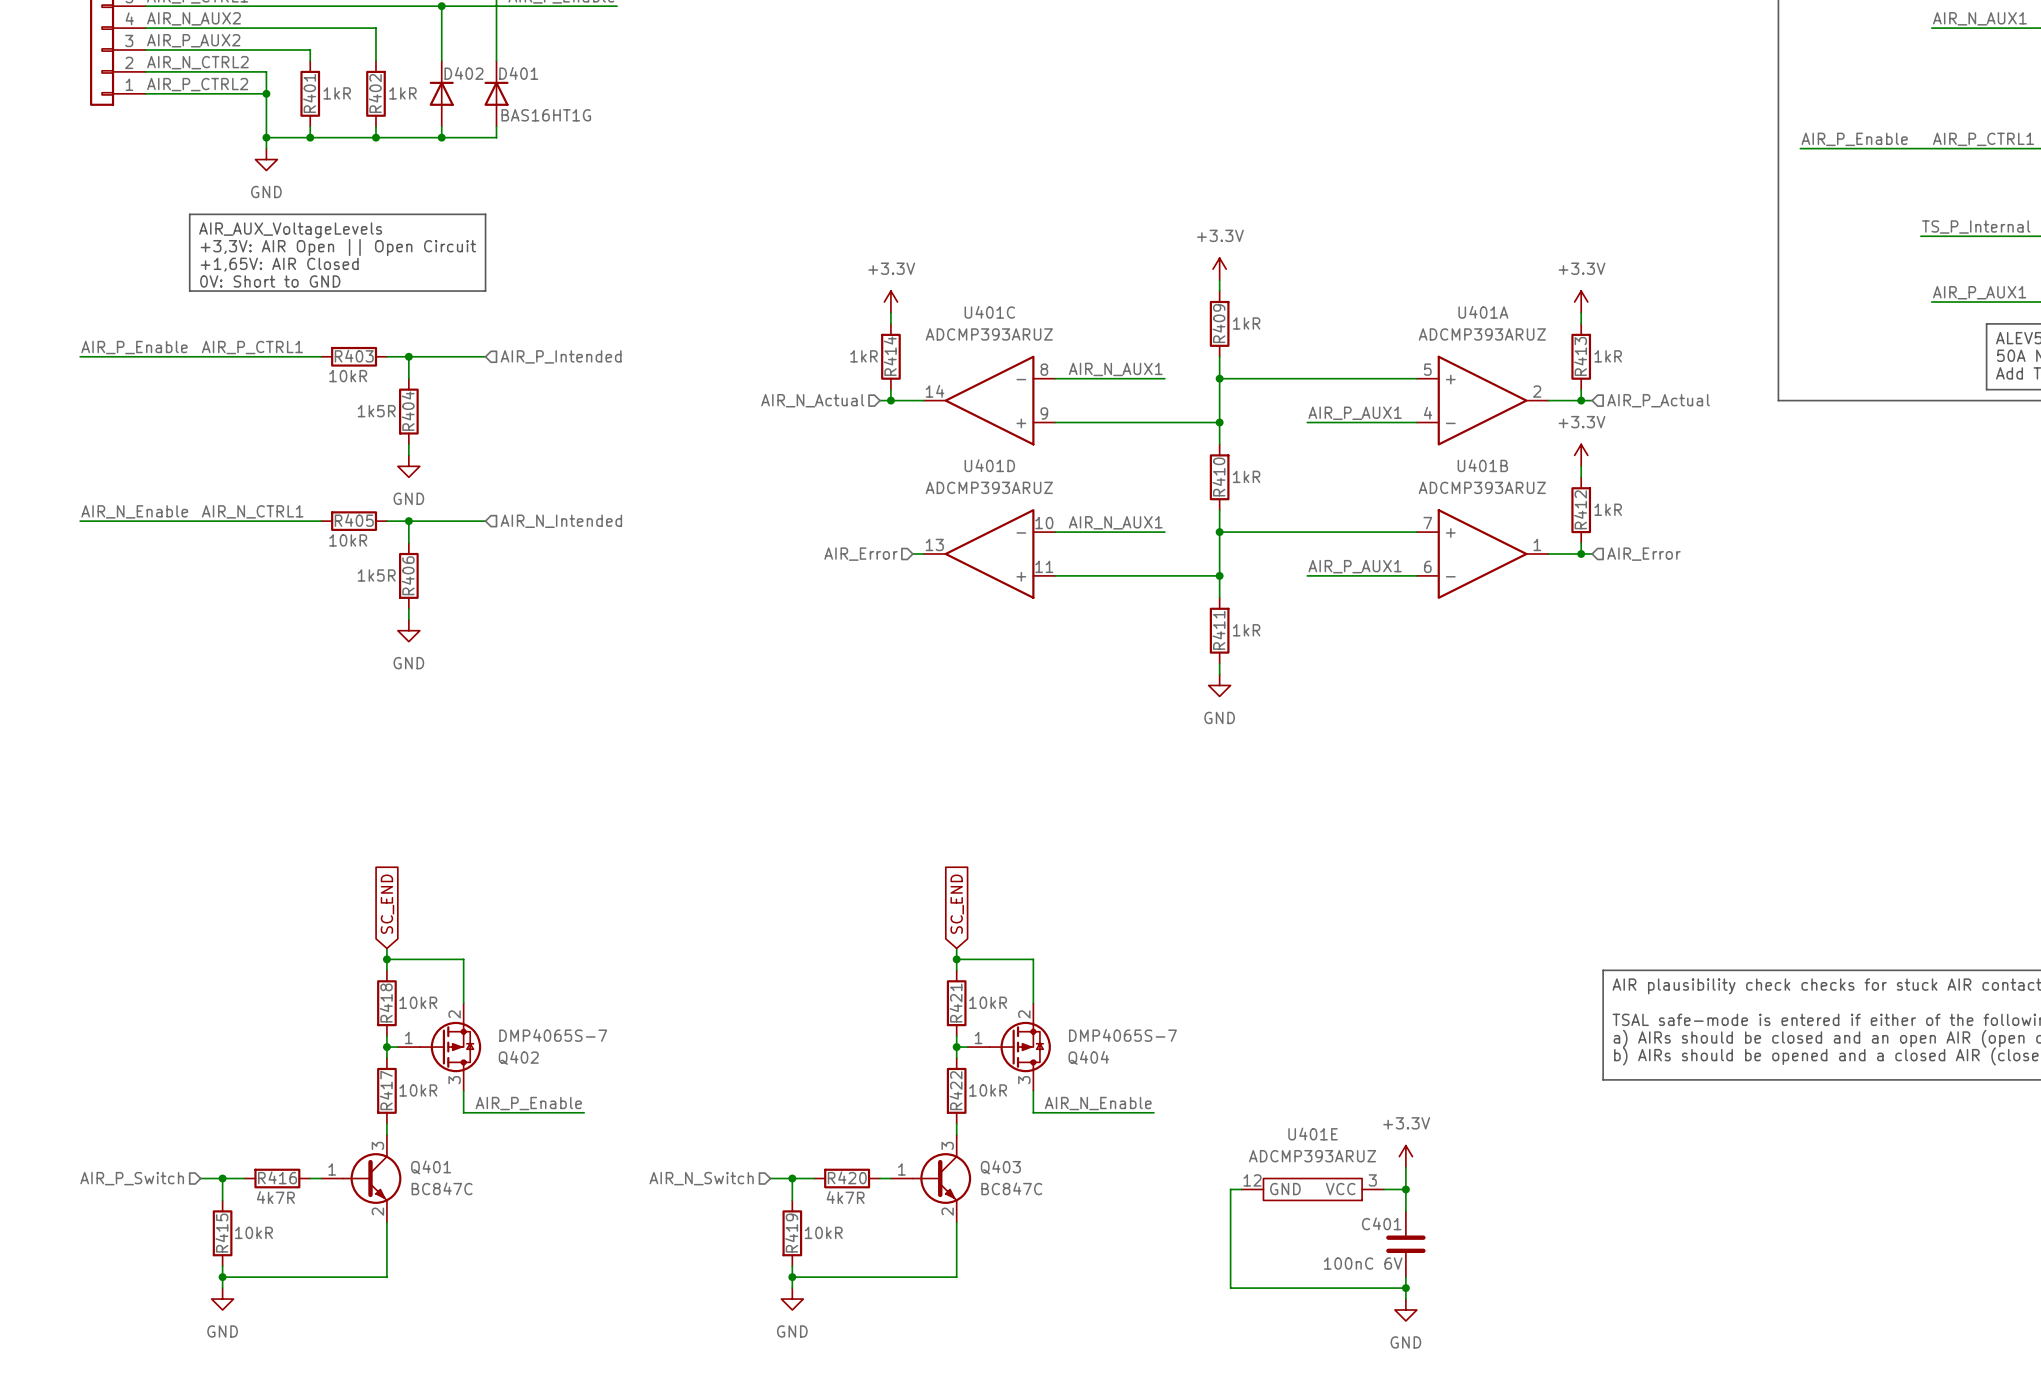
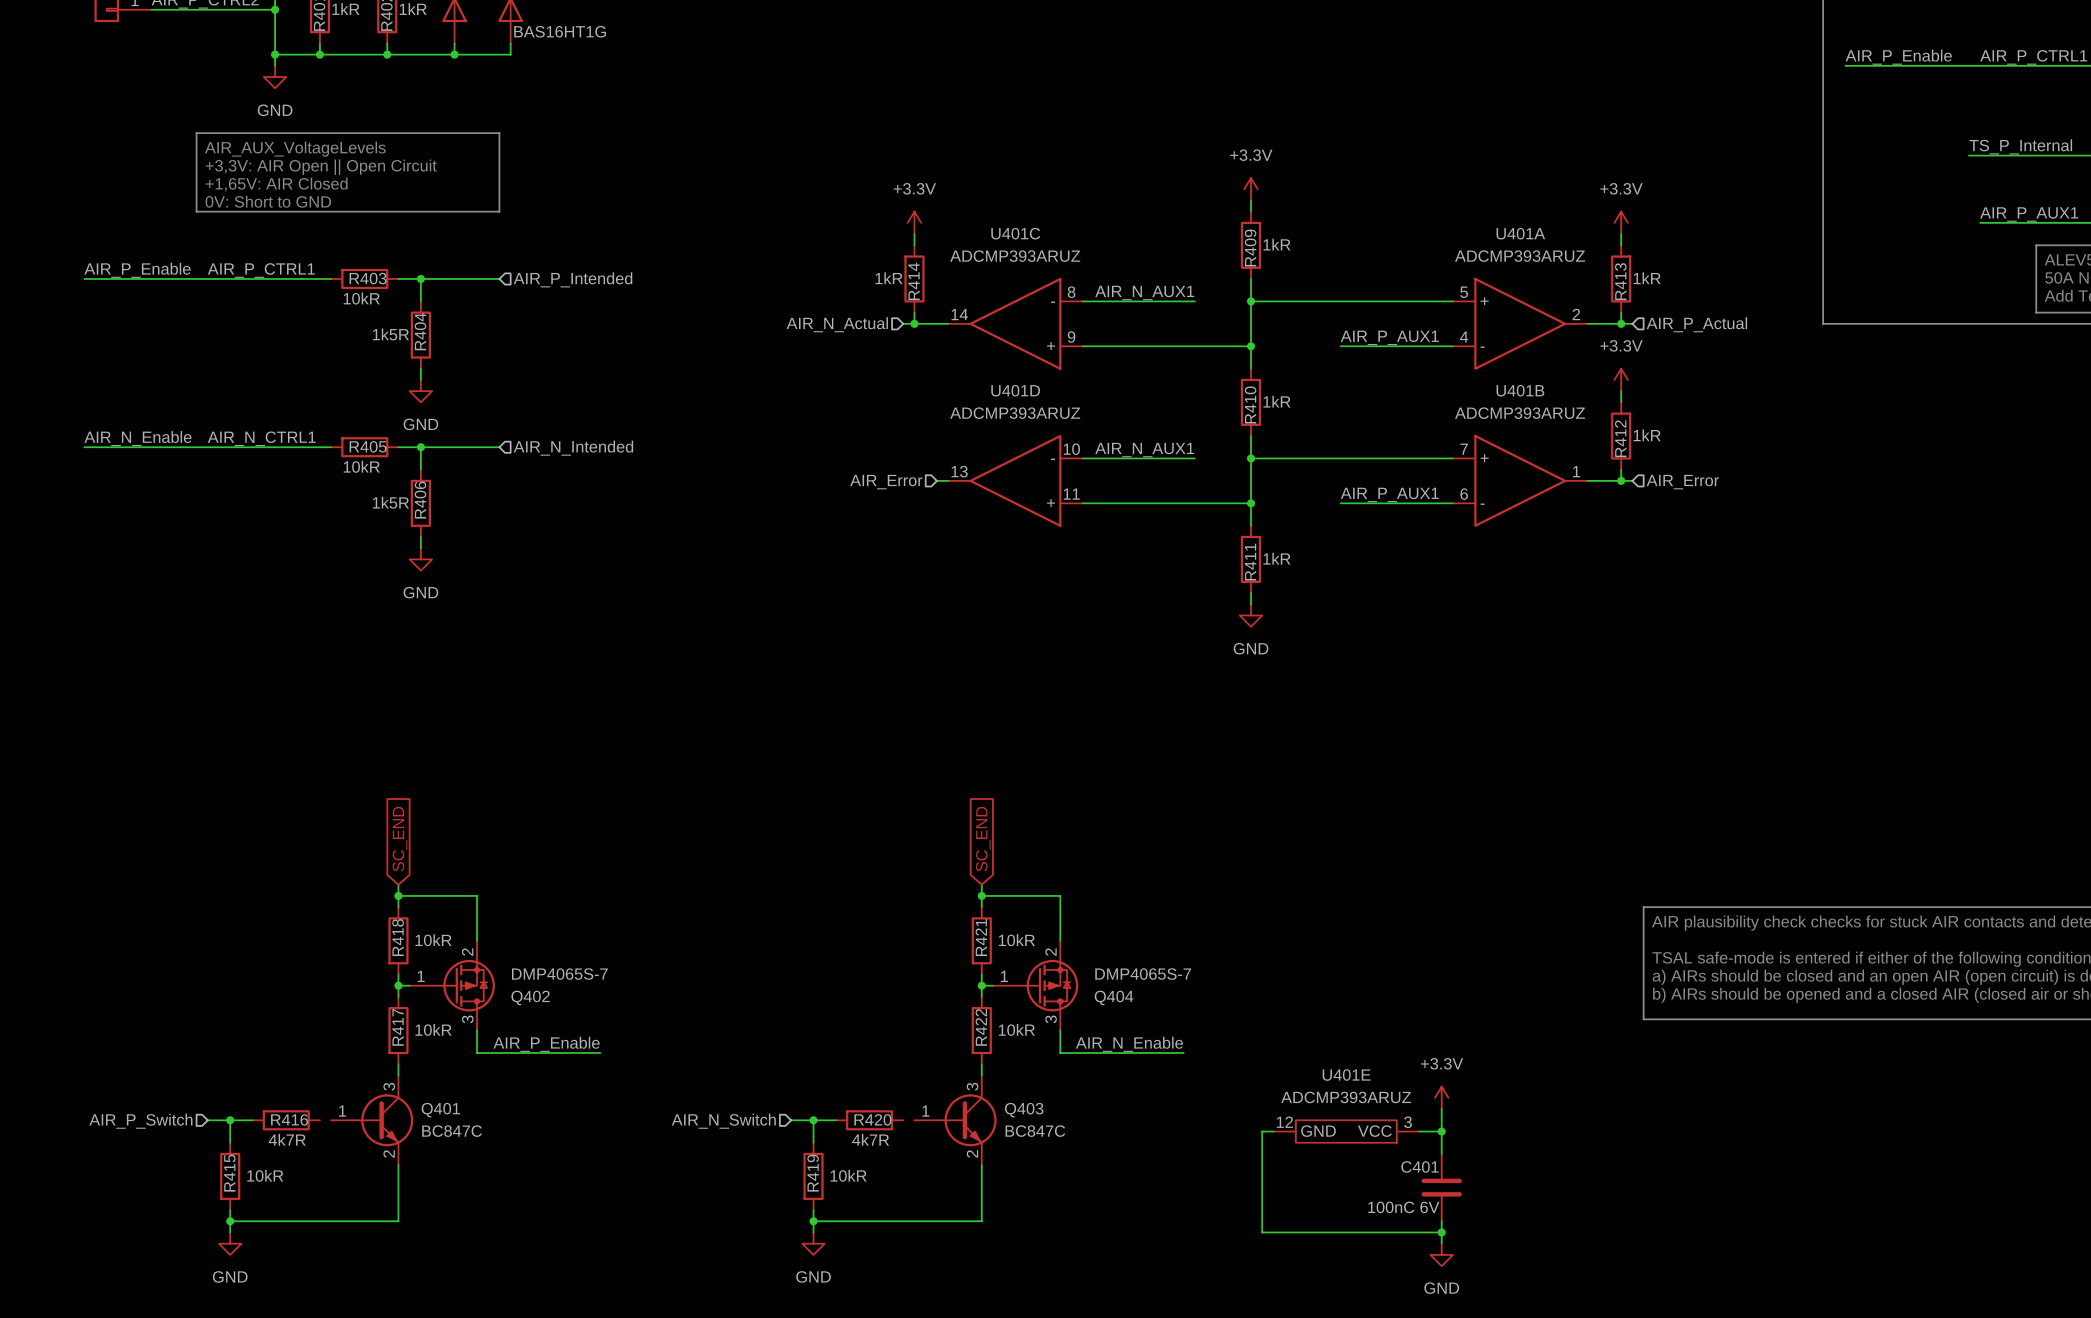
wire: (310, 1178) (321, 1178) -> none
wire: (879, 1178) (890, 1178) -> none

